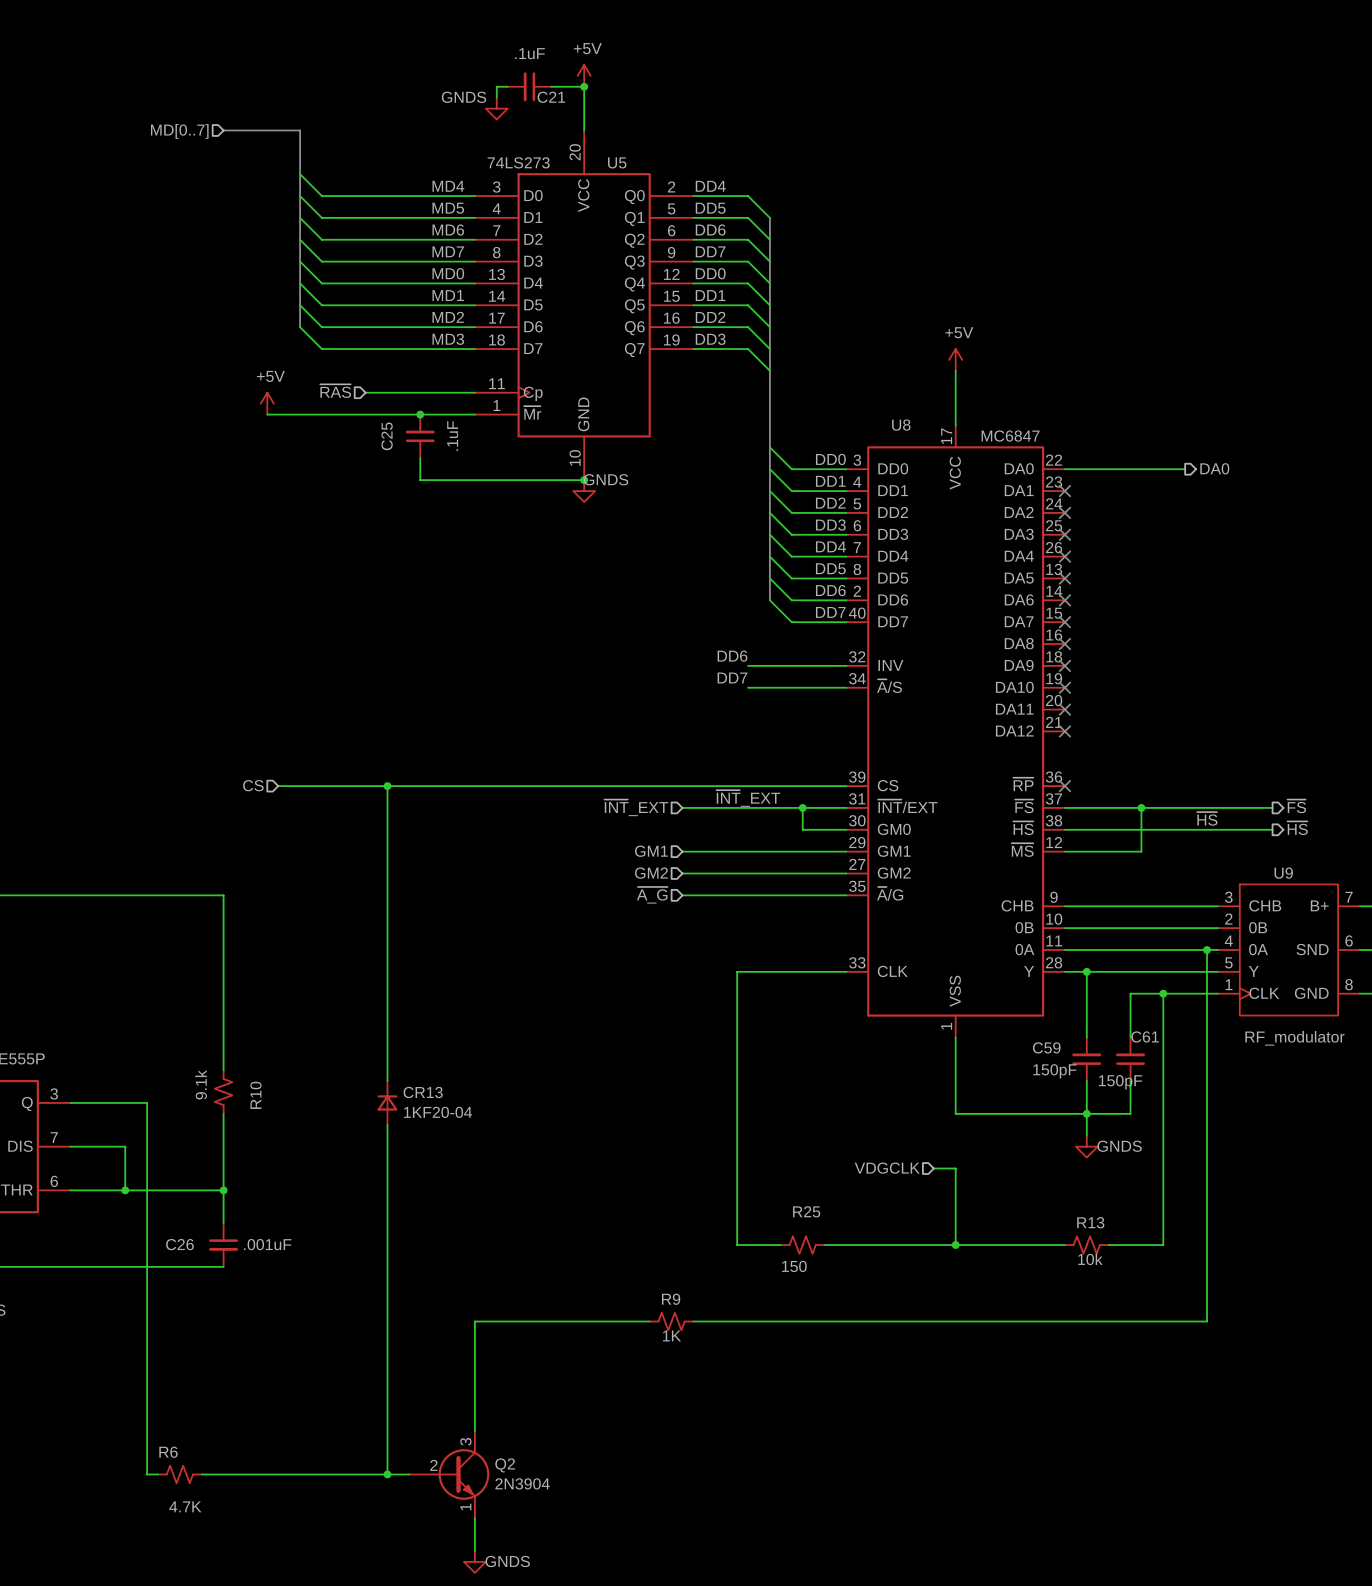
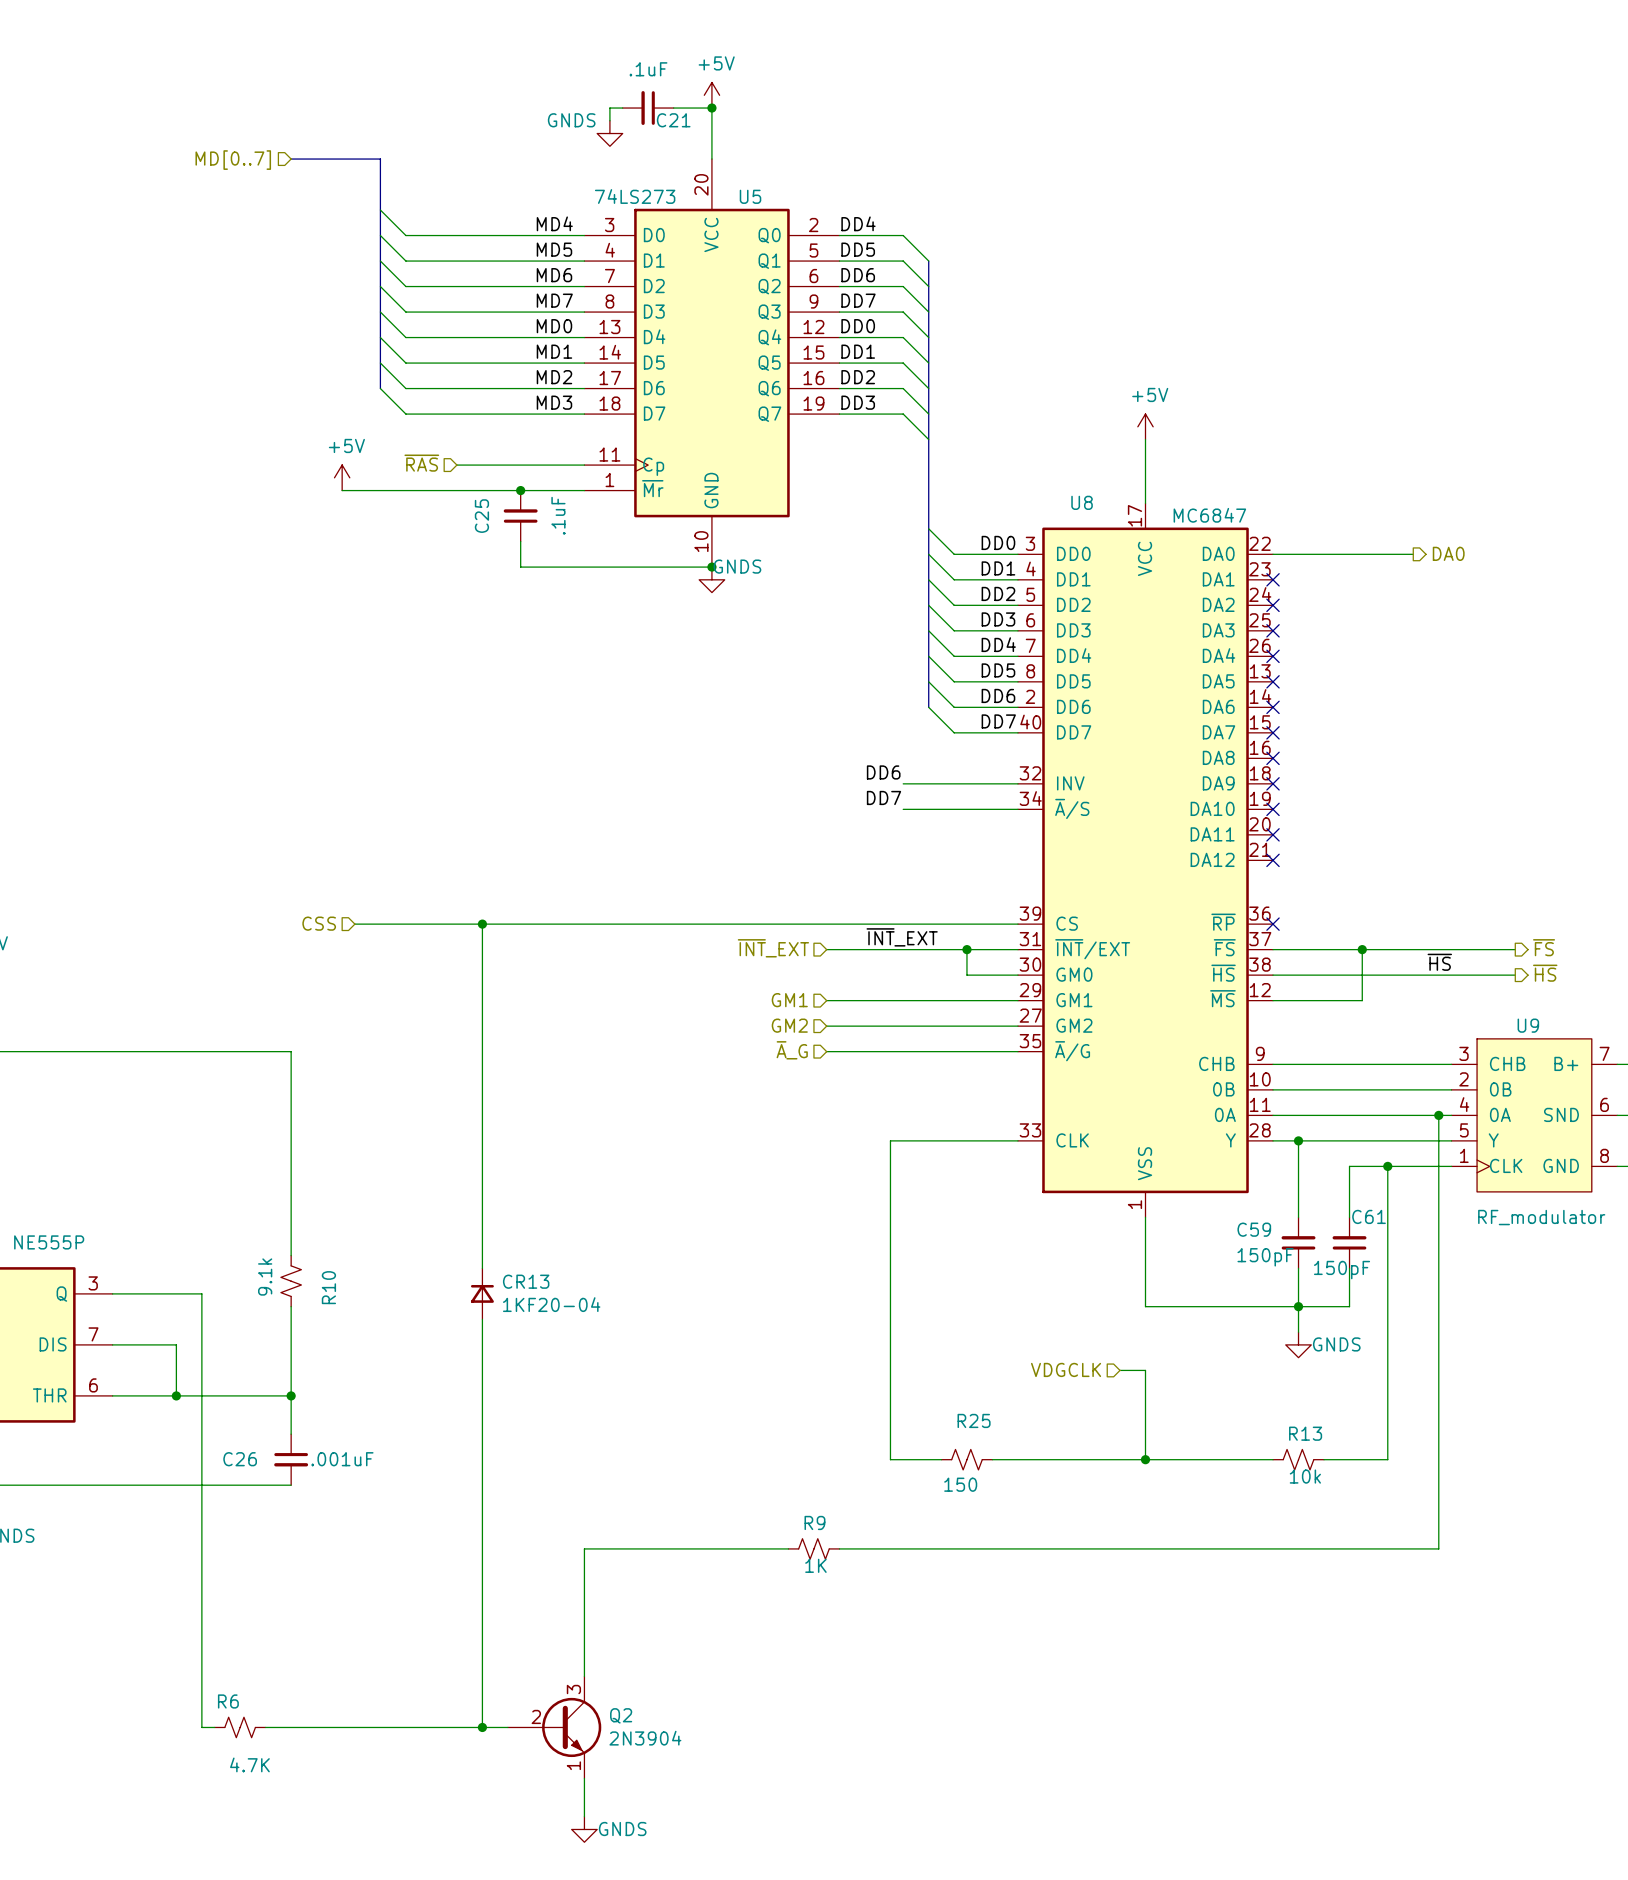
hierarchical label: CS (253, 785) -> CSS (319, 923)
hierarchical label: ~{A_G} (652, 895) -> ~{A}_G (792, 1050)

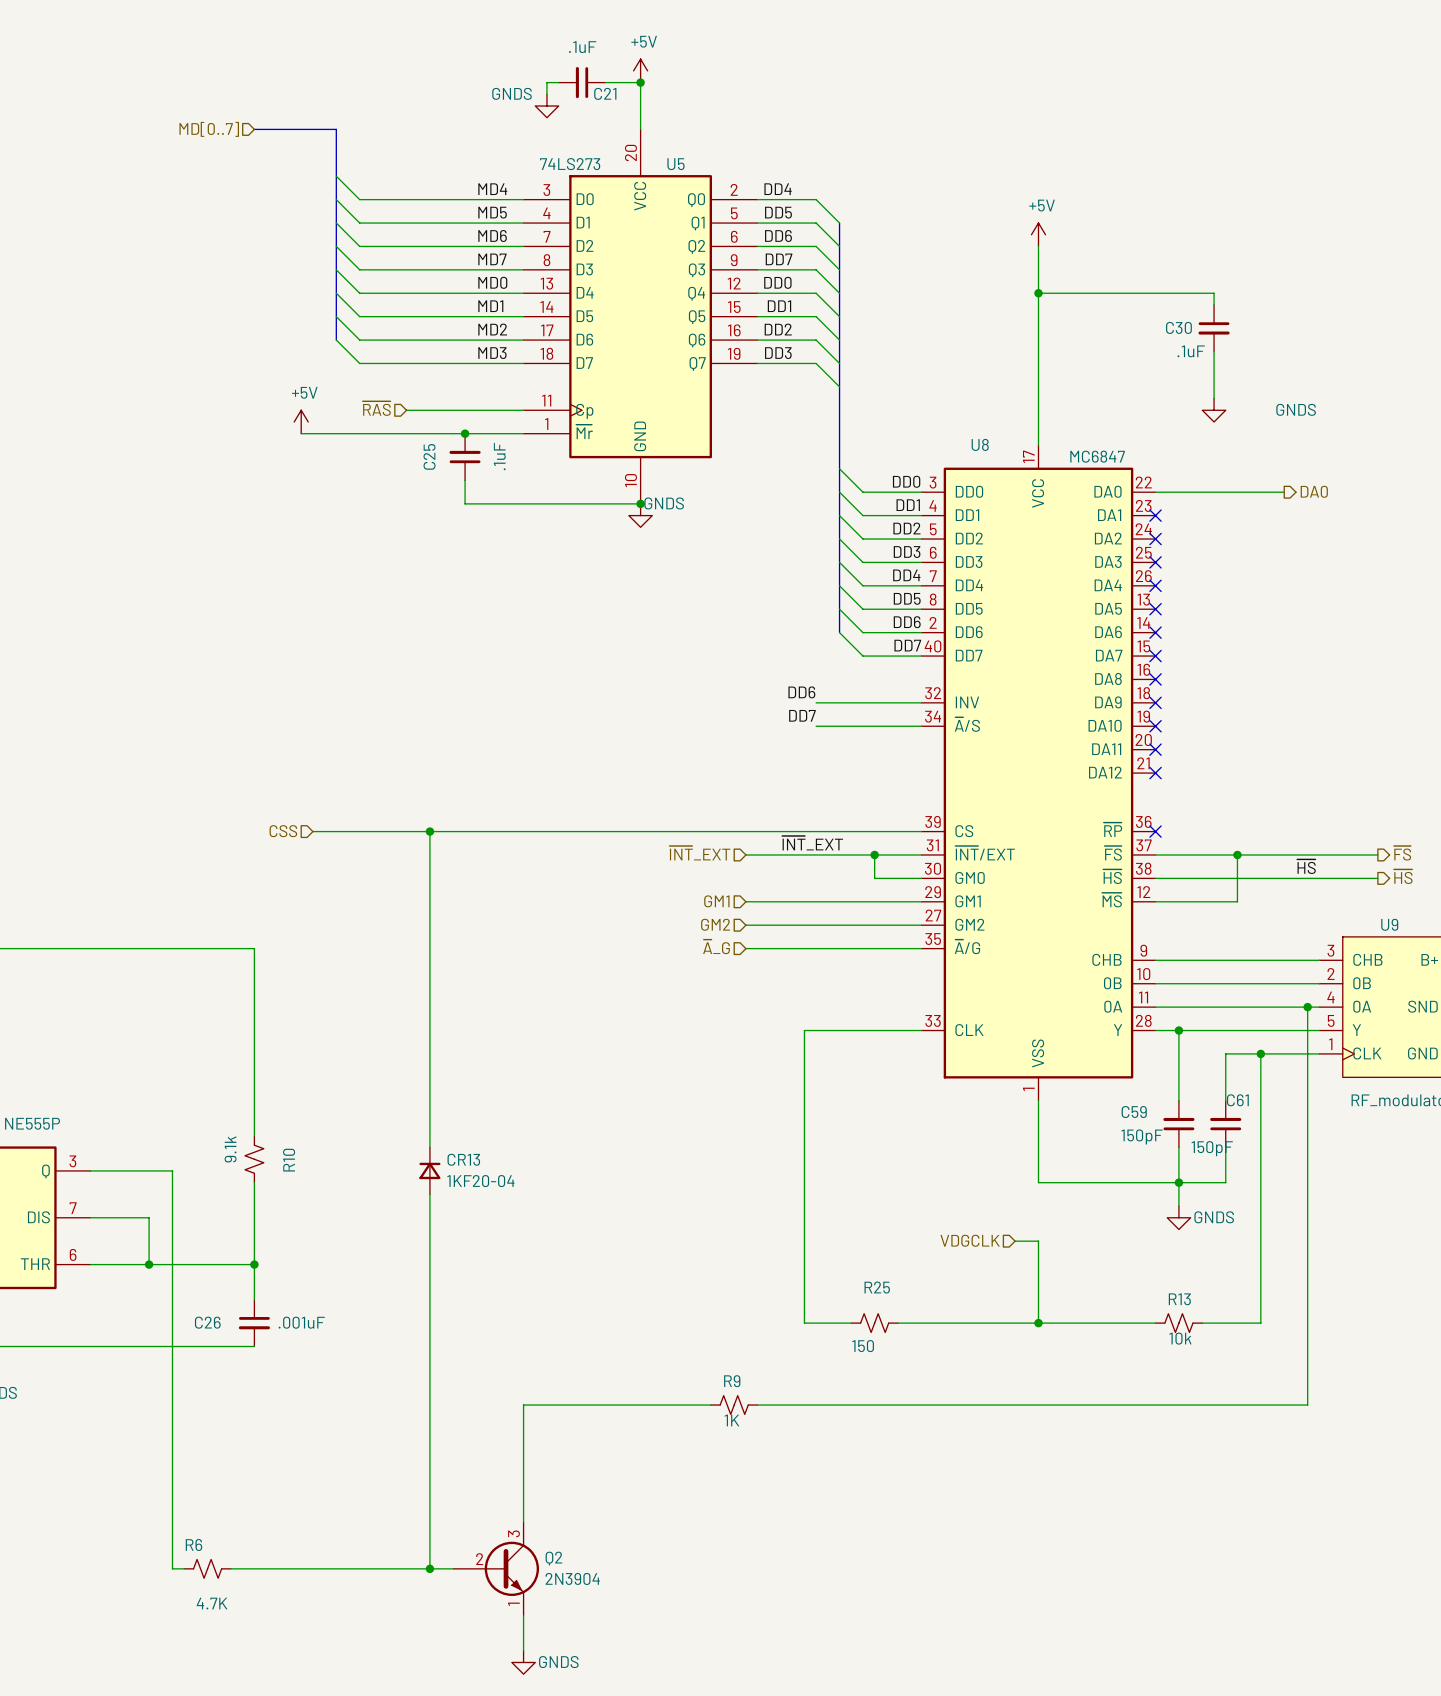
wire: none -> (1038, 246) (1038, 386)
wire: none -> (1038, 293) (1214, 293) (1214, 304)
junction: none -> (1038, 293)
C30: none -> .1uF (1214, 328)
wire: none -> (1214, 351) (1214, 398)
power symbol position: +5V (1145, 426) -> +5V (1038, 234)
power symbol: none -> GNDS (1214, 410)

